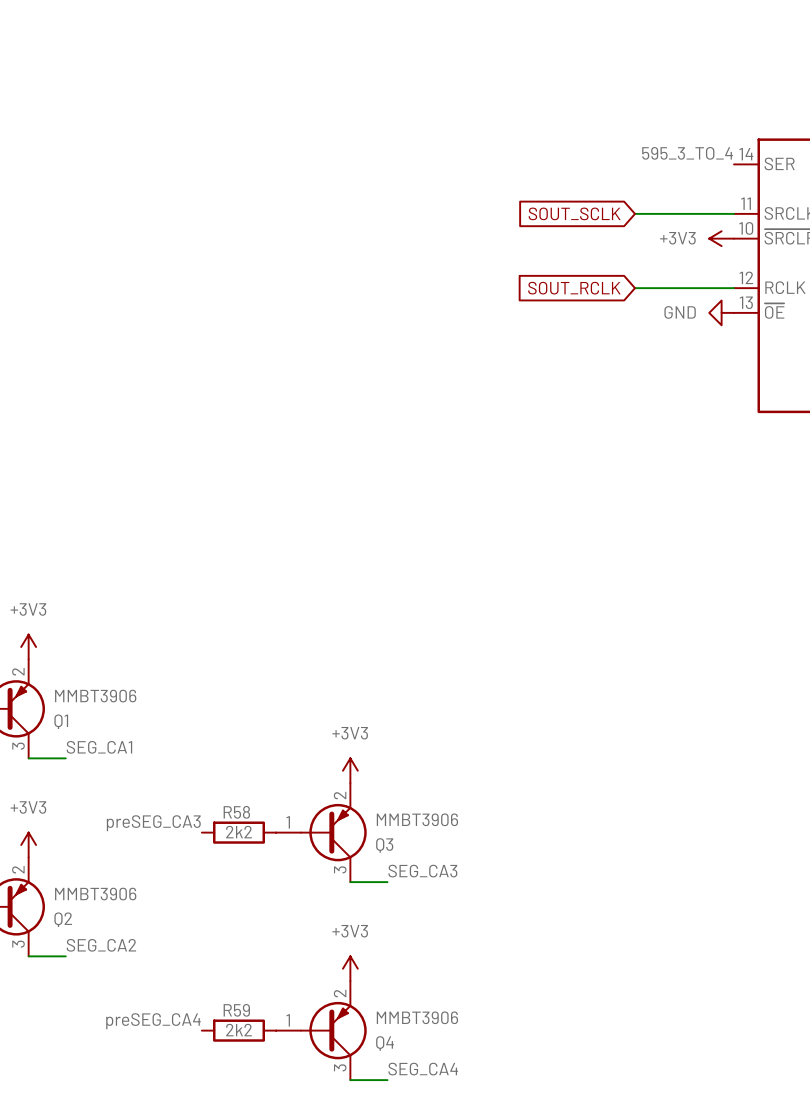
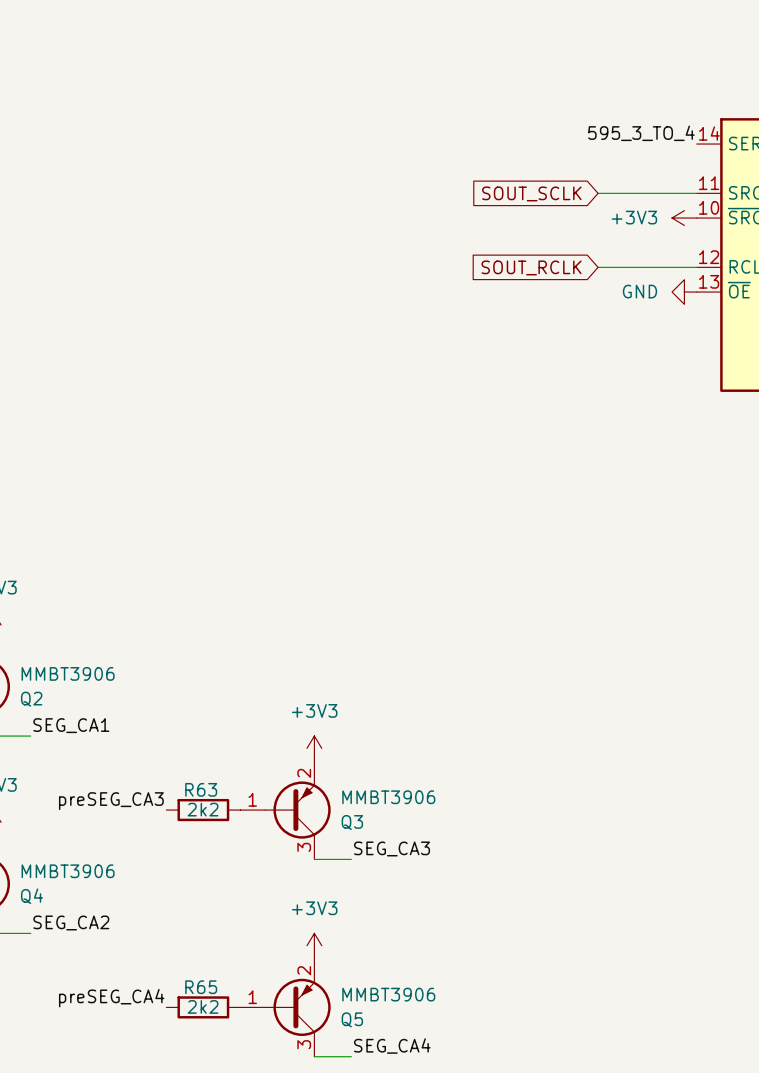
Q1 name: Q1 (61, 721) -> Q2 (31, 699)
R58 name: R58 (236, 812) -> R63 (201, 789)
Q2 name: Q2 (63, 919) -> Q4 (31, 896)
R59 name: R59 (236, 1010) -> R65 (201, 987)
Q4 name: Q4 (385, 1043) -> Q5 (352, 1019)

